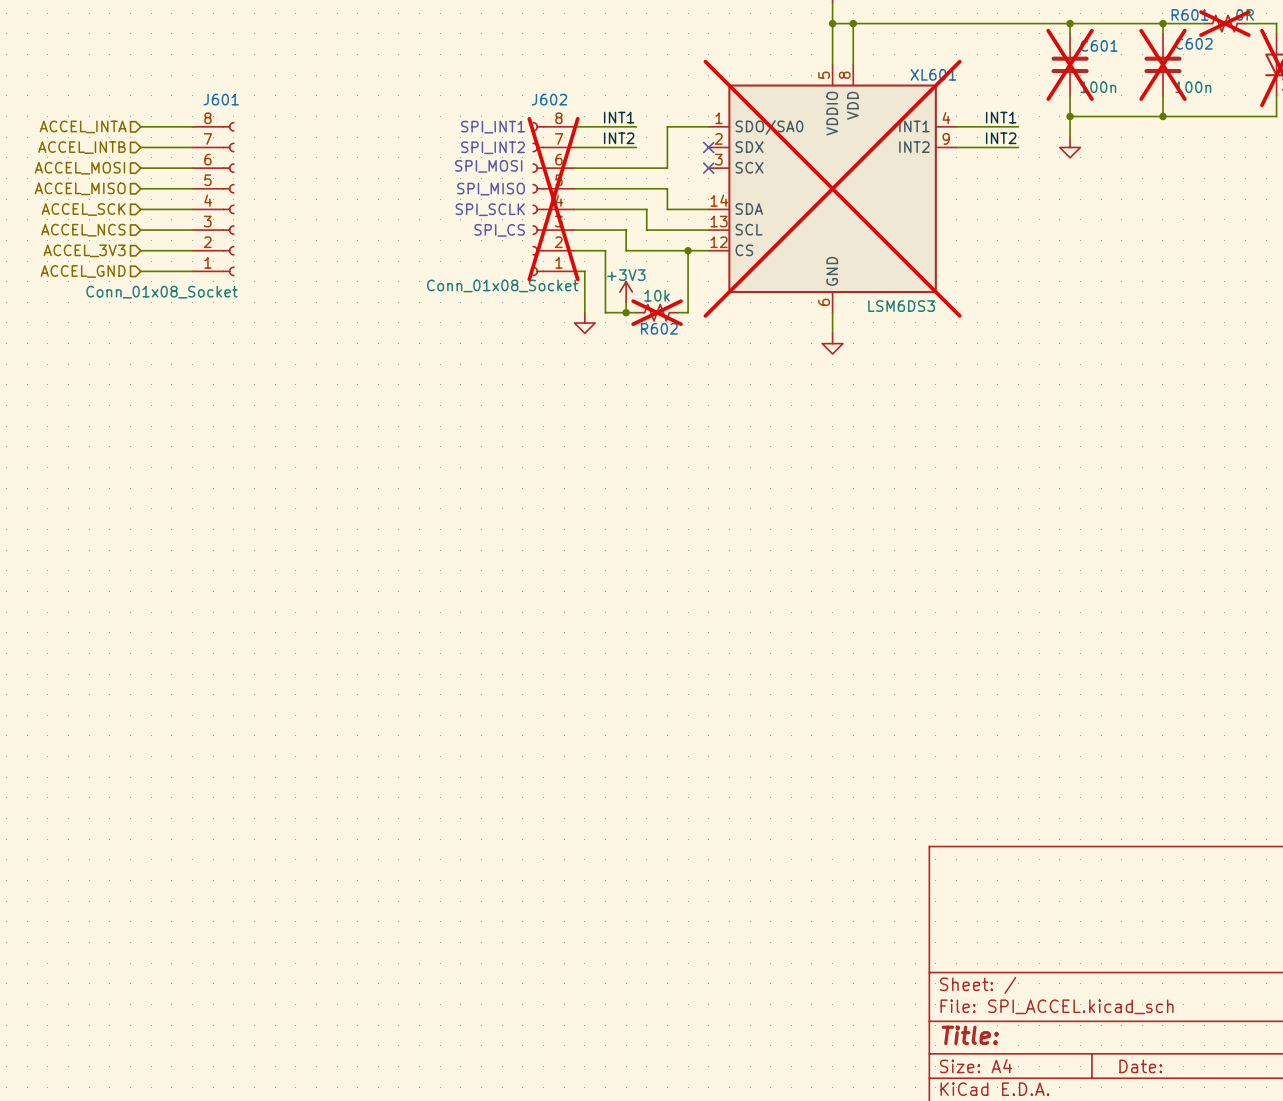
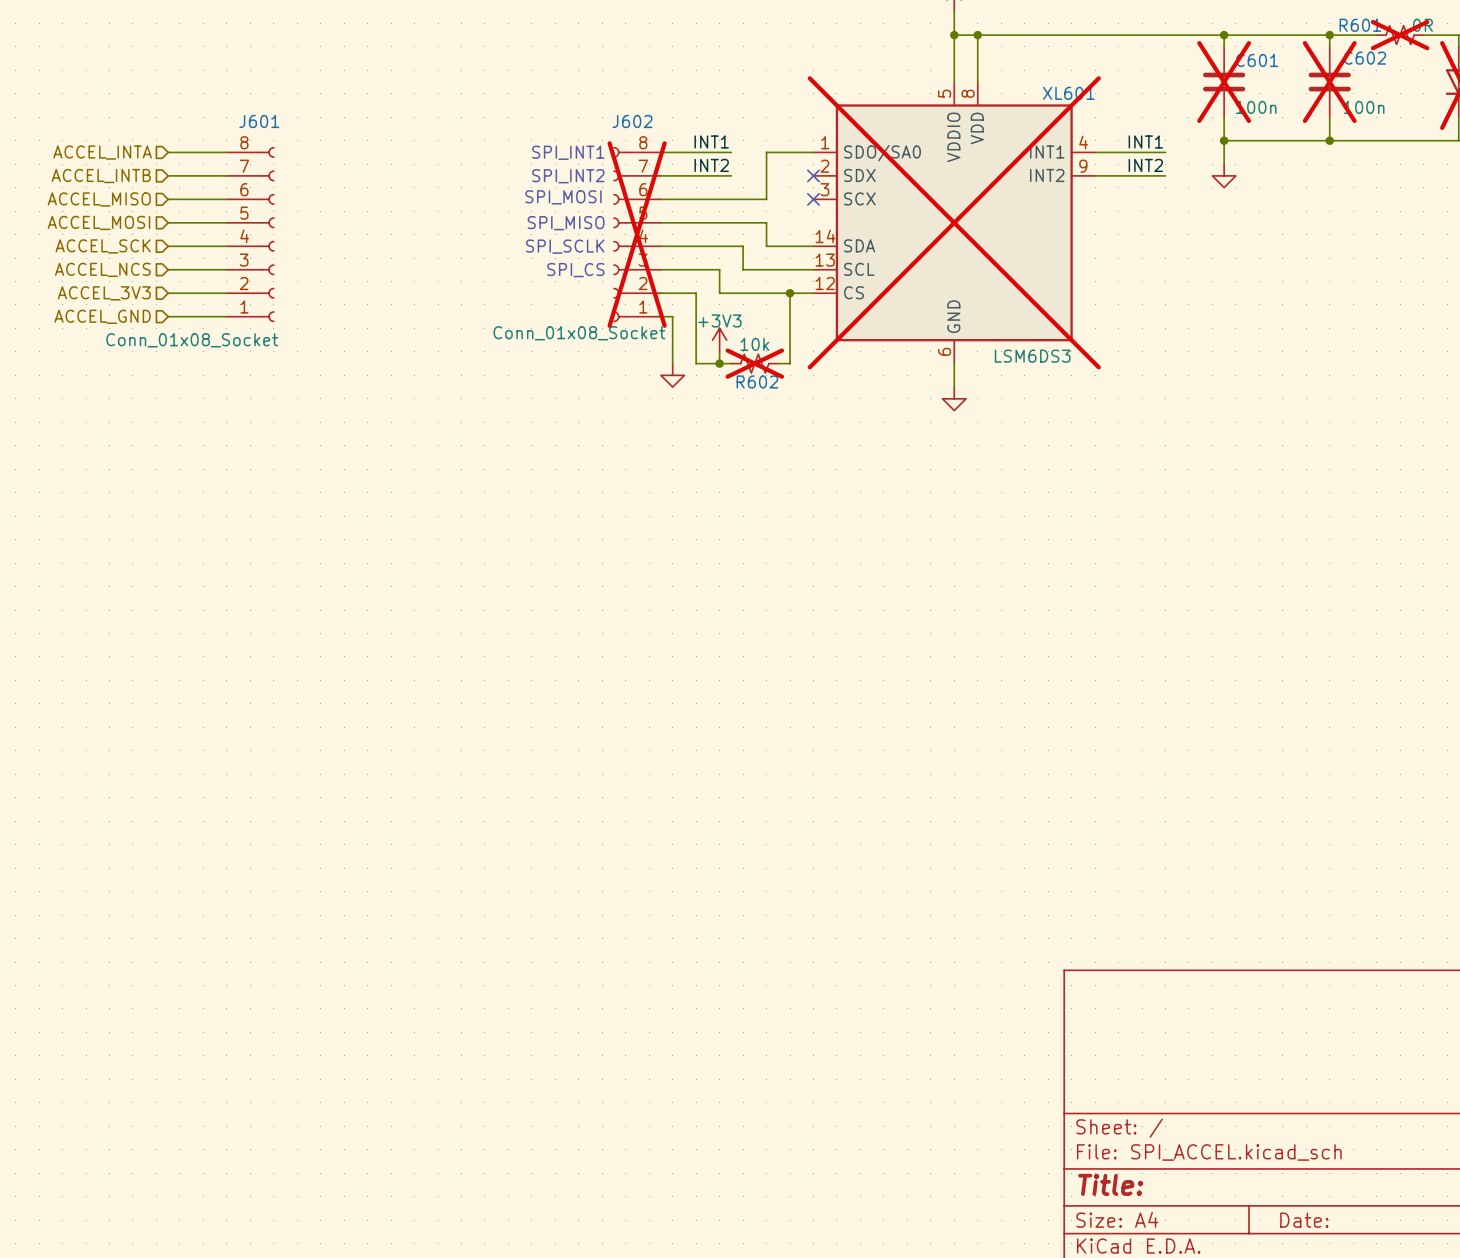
hierarchical label: ACCEL_MOSI (79, 168) -> ACCEL_MISO (99, 199)
hierarchical label: ACCEL_MISO (80, 188) -> ACCEL_MOSI (98, 222)

